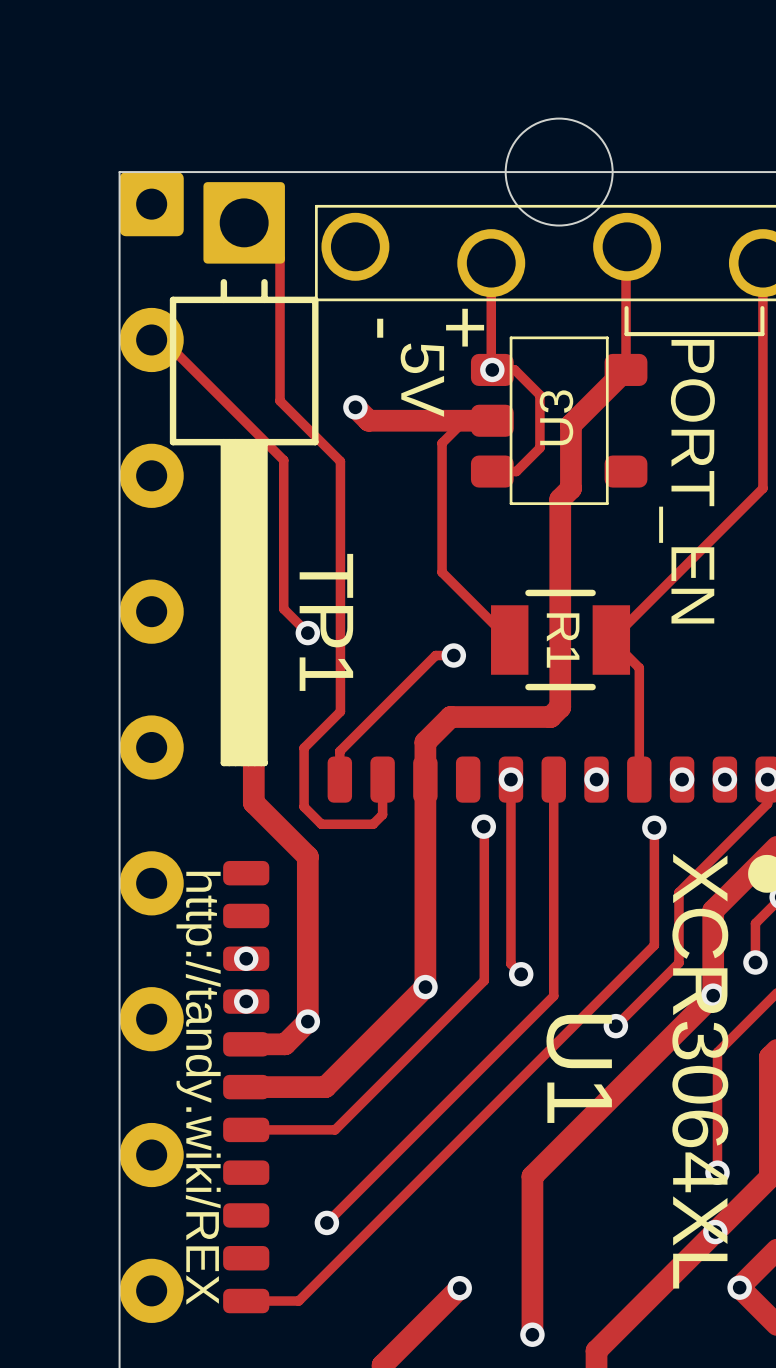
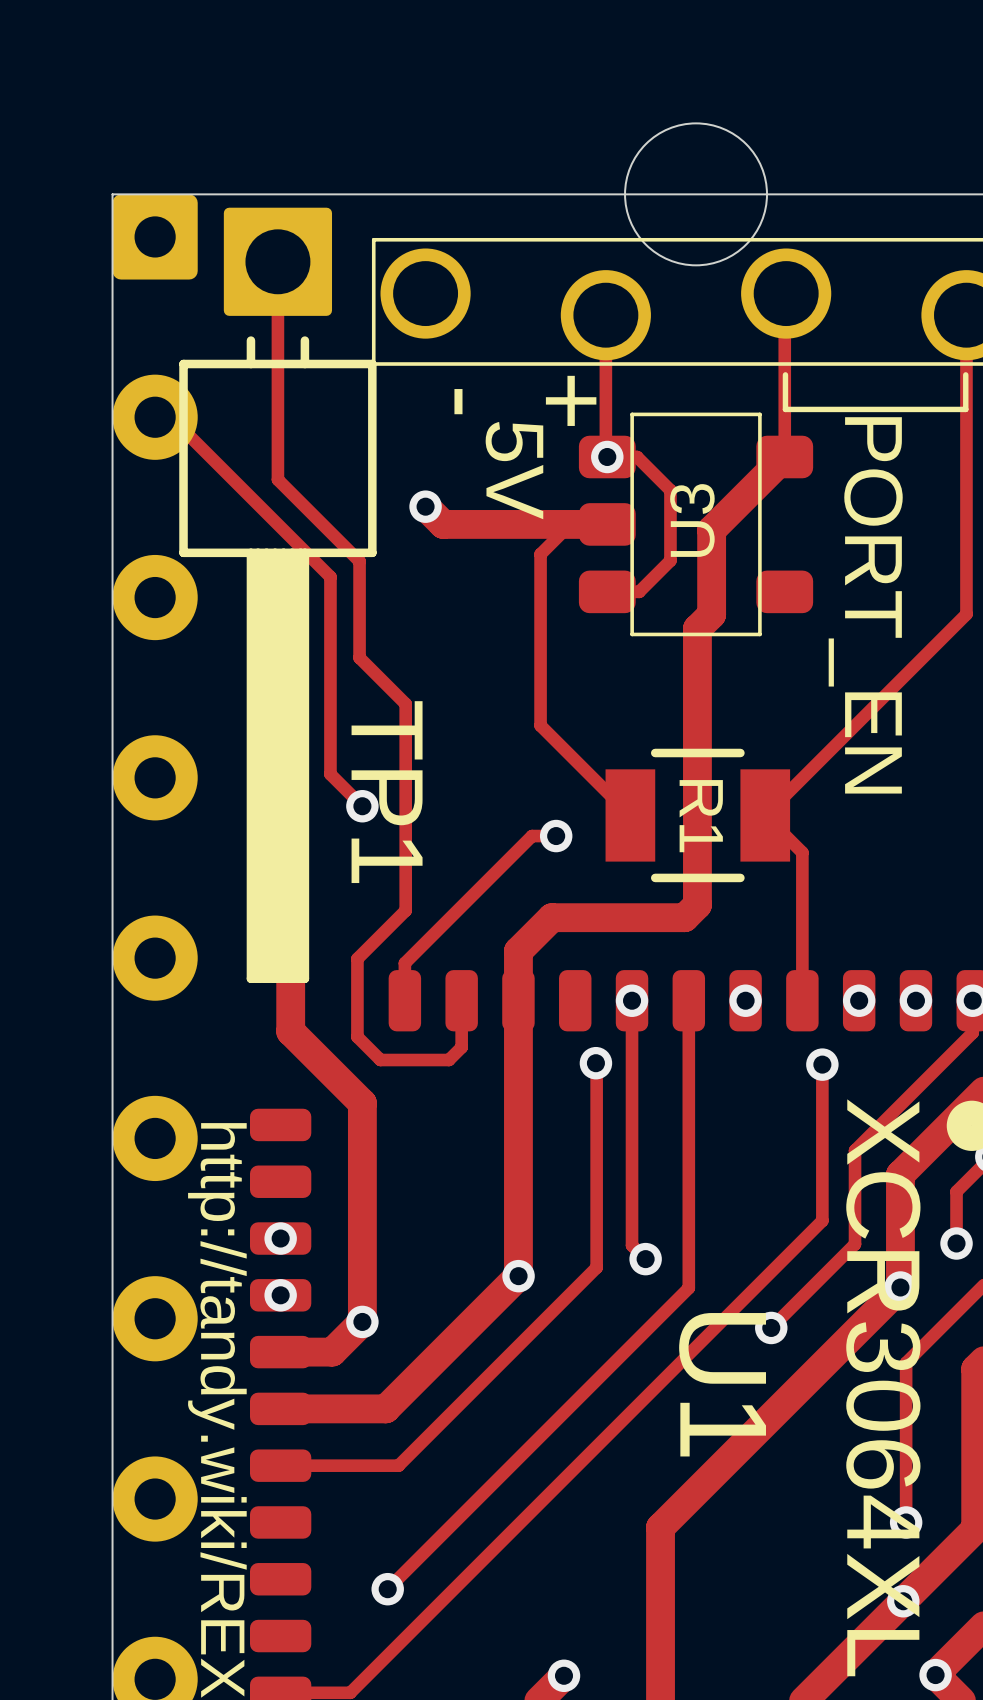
track: (244, 222) (280, 258) (280, 400) (340, 461) (340, 556) -> (277, 261) (277, 479) (359, 561) (359, 657) (405, 704)

